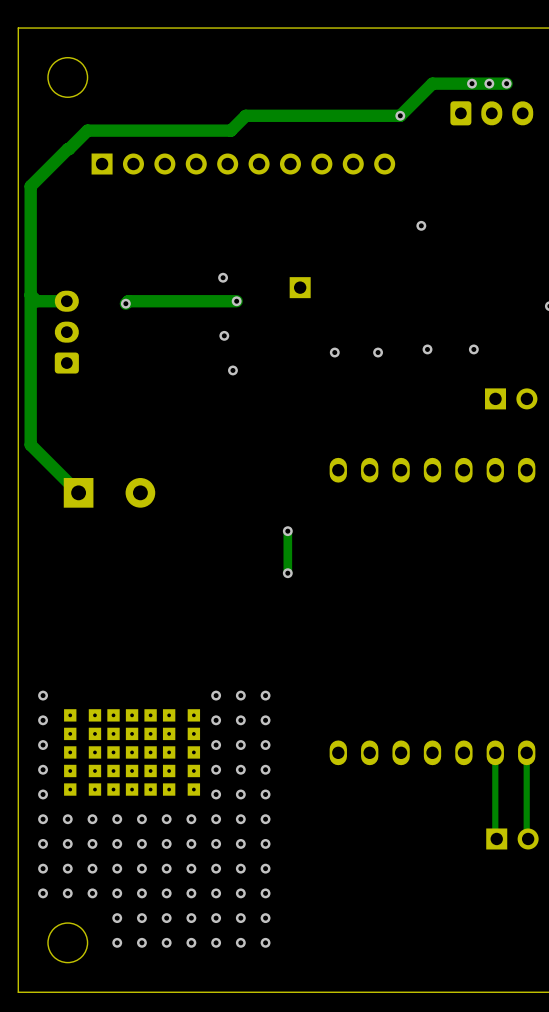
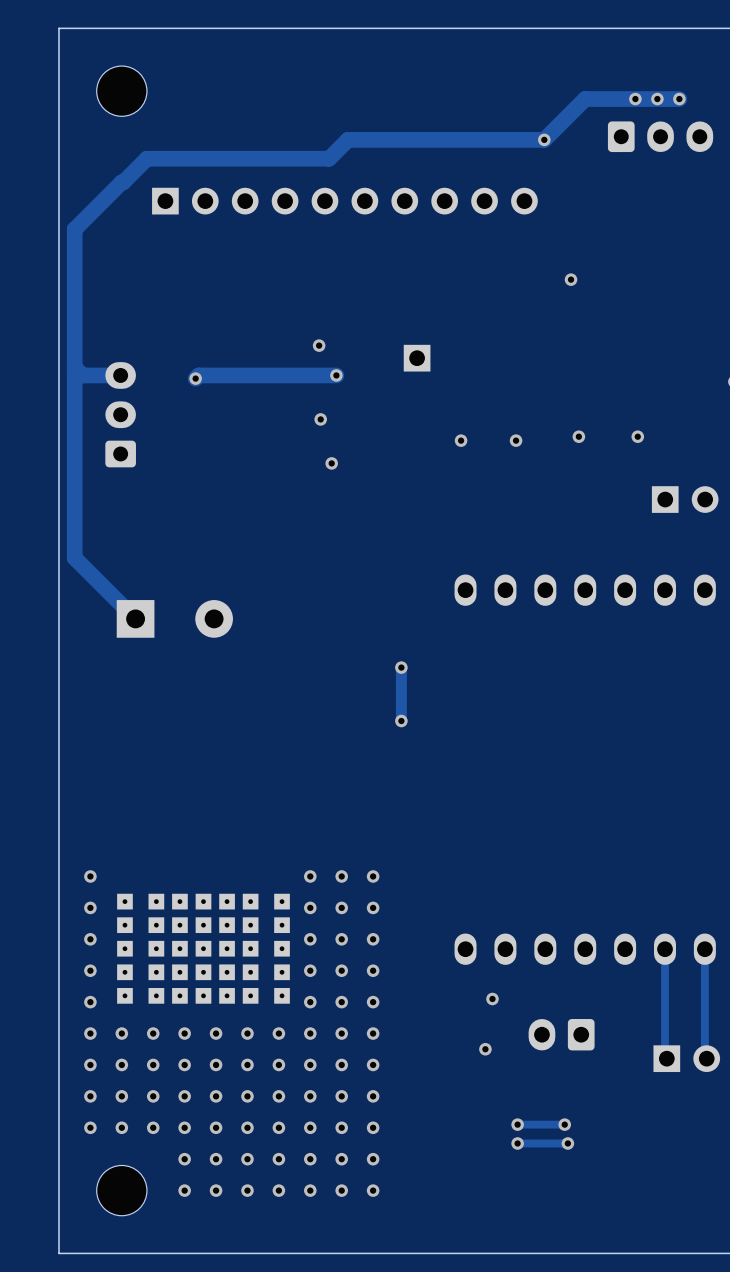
via: none -> (492, 998)
part: none -> (561, 1034)
via: none -> (485, 1049)
via: none -> (517, 1124)
track: none -> (564, 1124) (517, 1124)
via: none -> (564, 1124)
via: none -> (517, 1143)
track: none -> (567, 1143) (517, 1143)
via: none -> (567, 1143)

